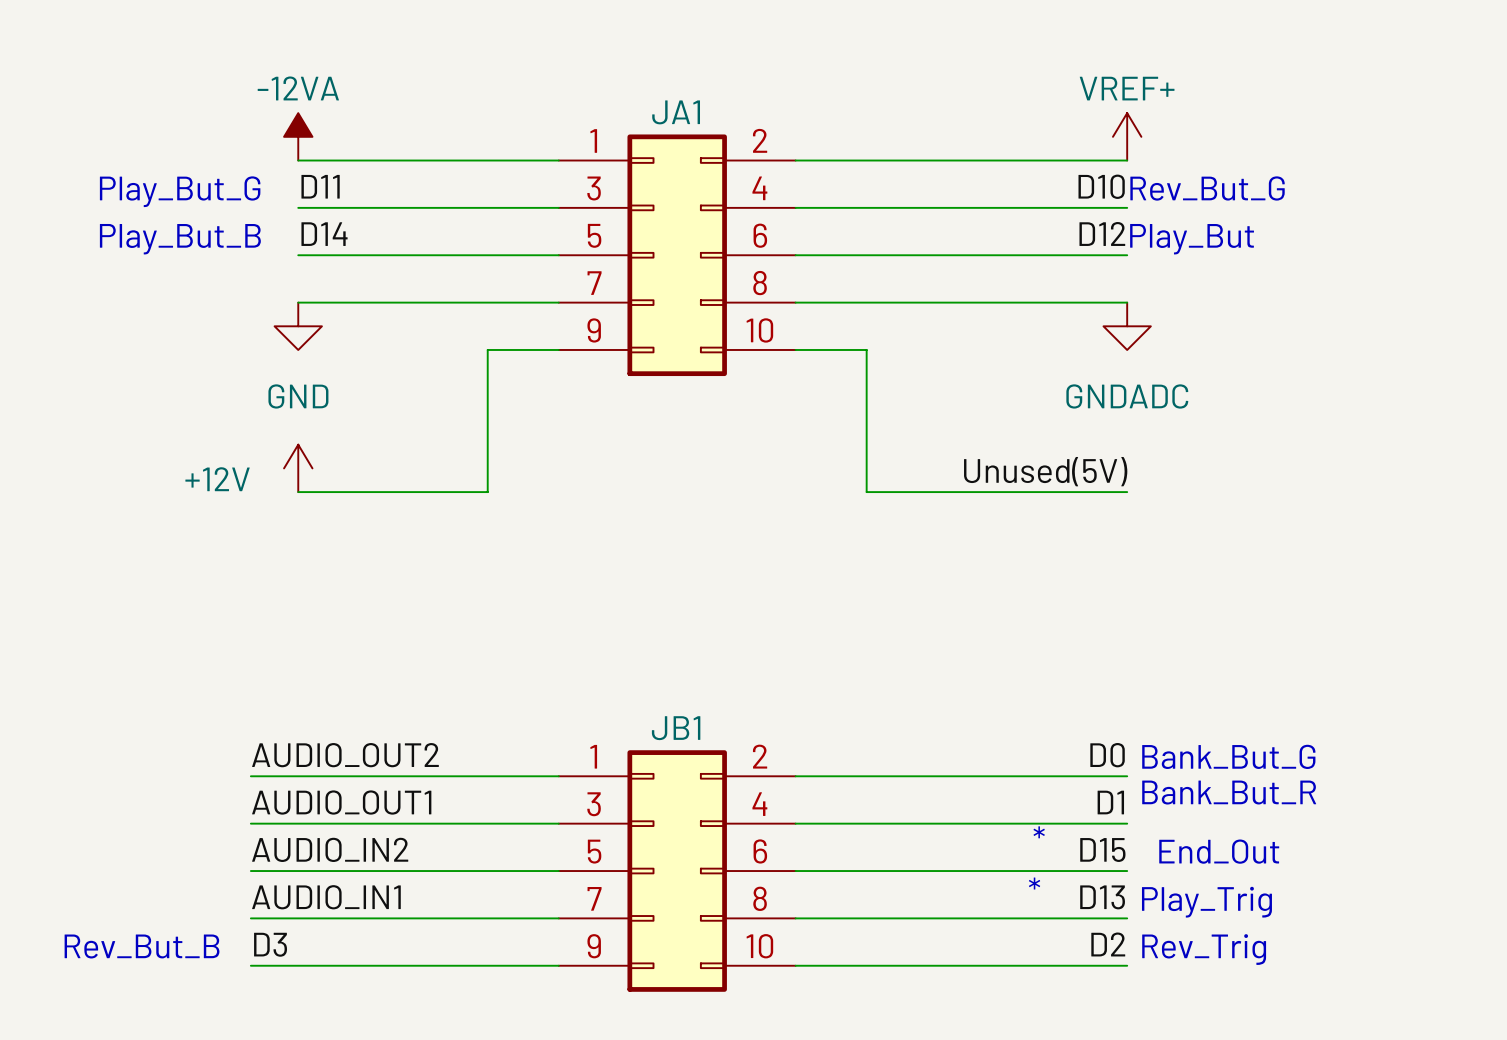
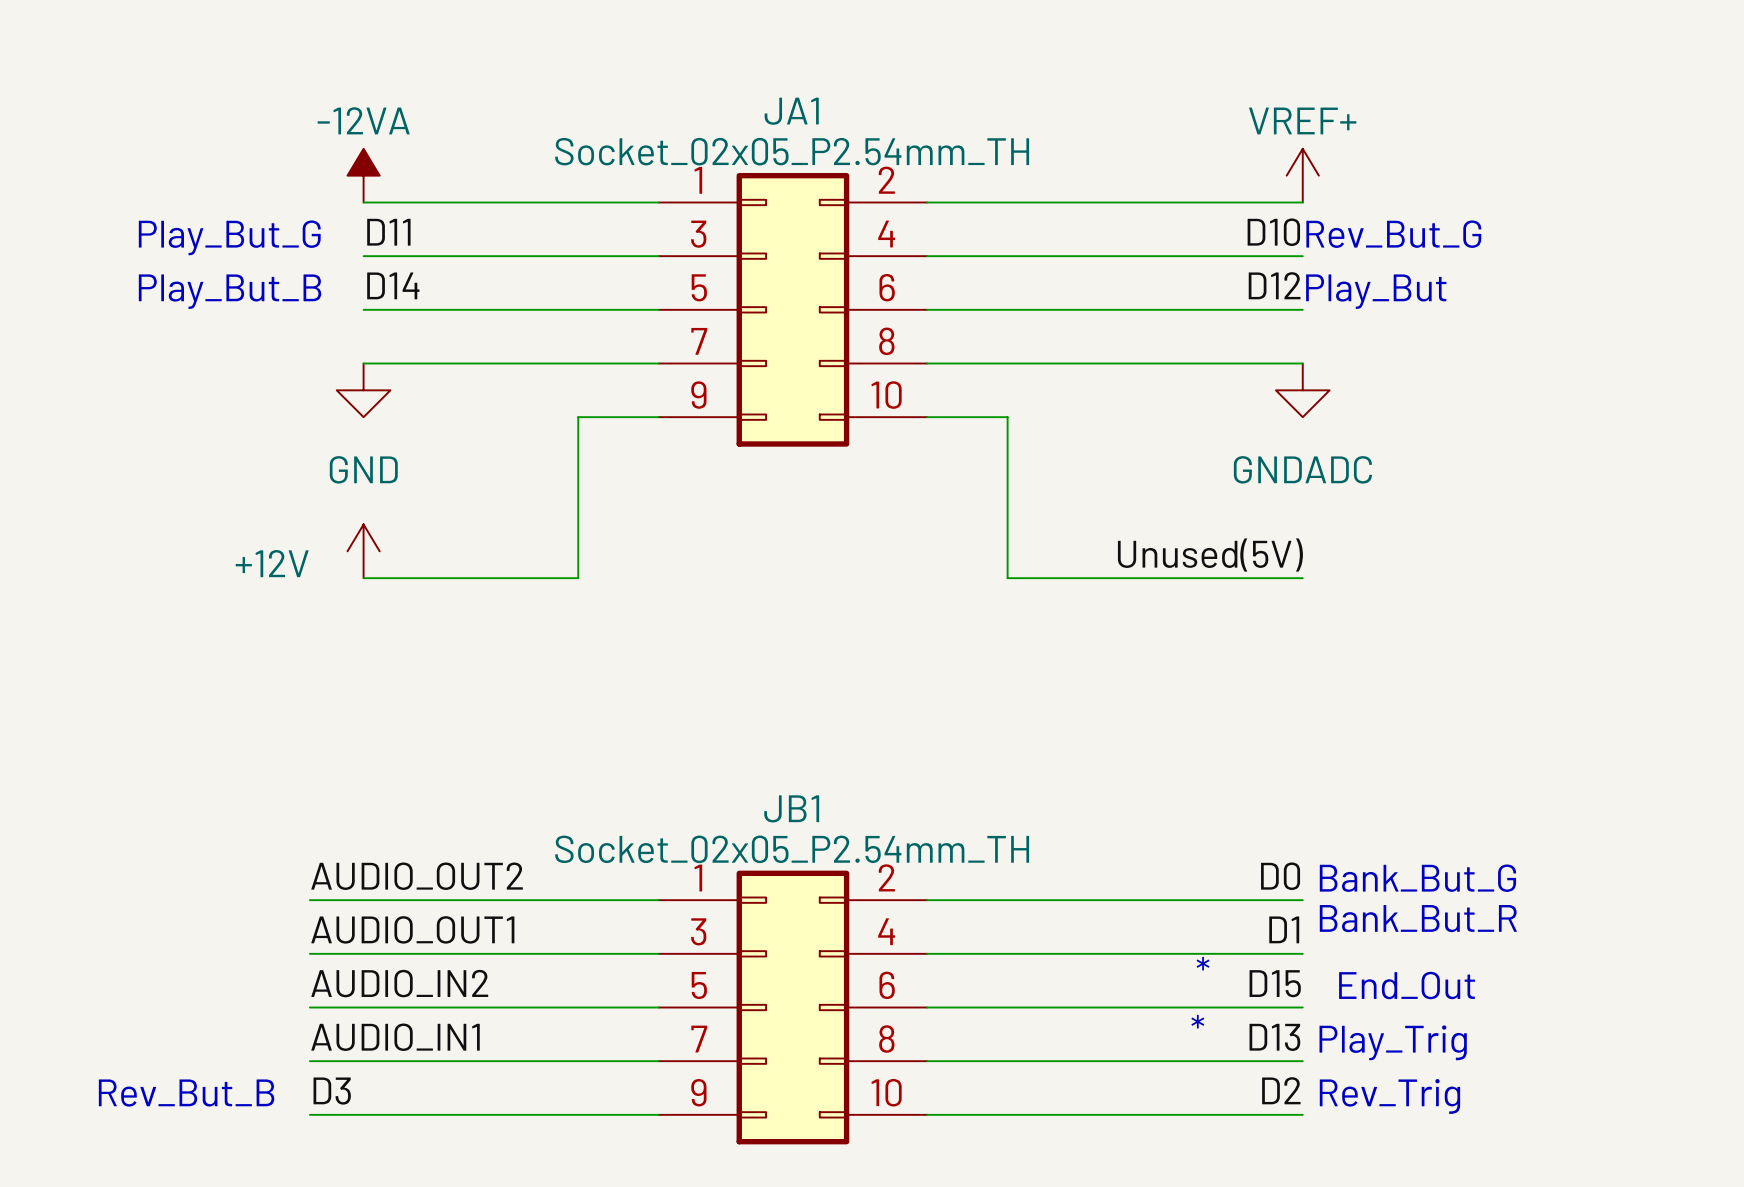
JA1 name position: JA1 (676, 112) -> JA1 (791, 111)
JA1 value: none -> Socket_02x05_P2.54mm_TH (792, 151)
JB1 name position: JB1 (676, 728) -> JB1 (791, 808)
JB1 value: none -> Socket_02x05_P2.54mm_TH (792, 849)

